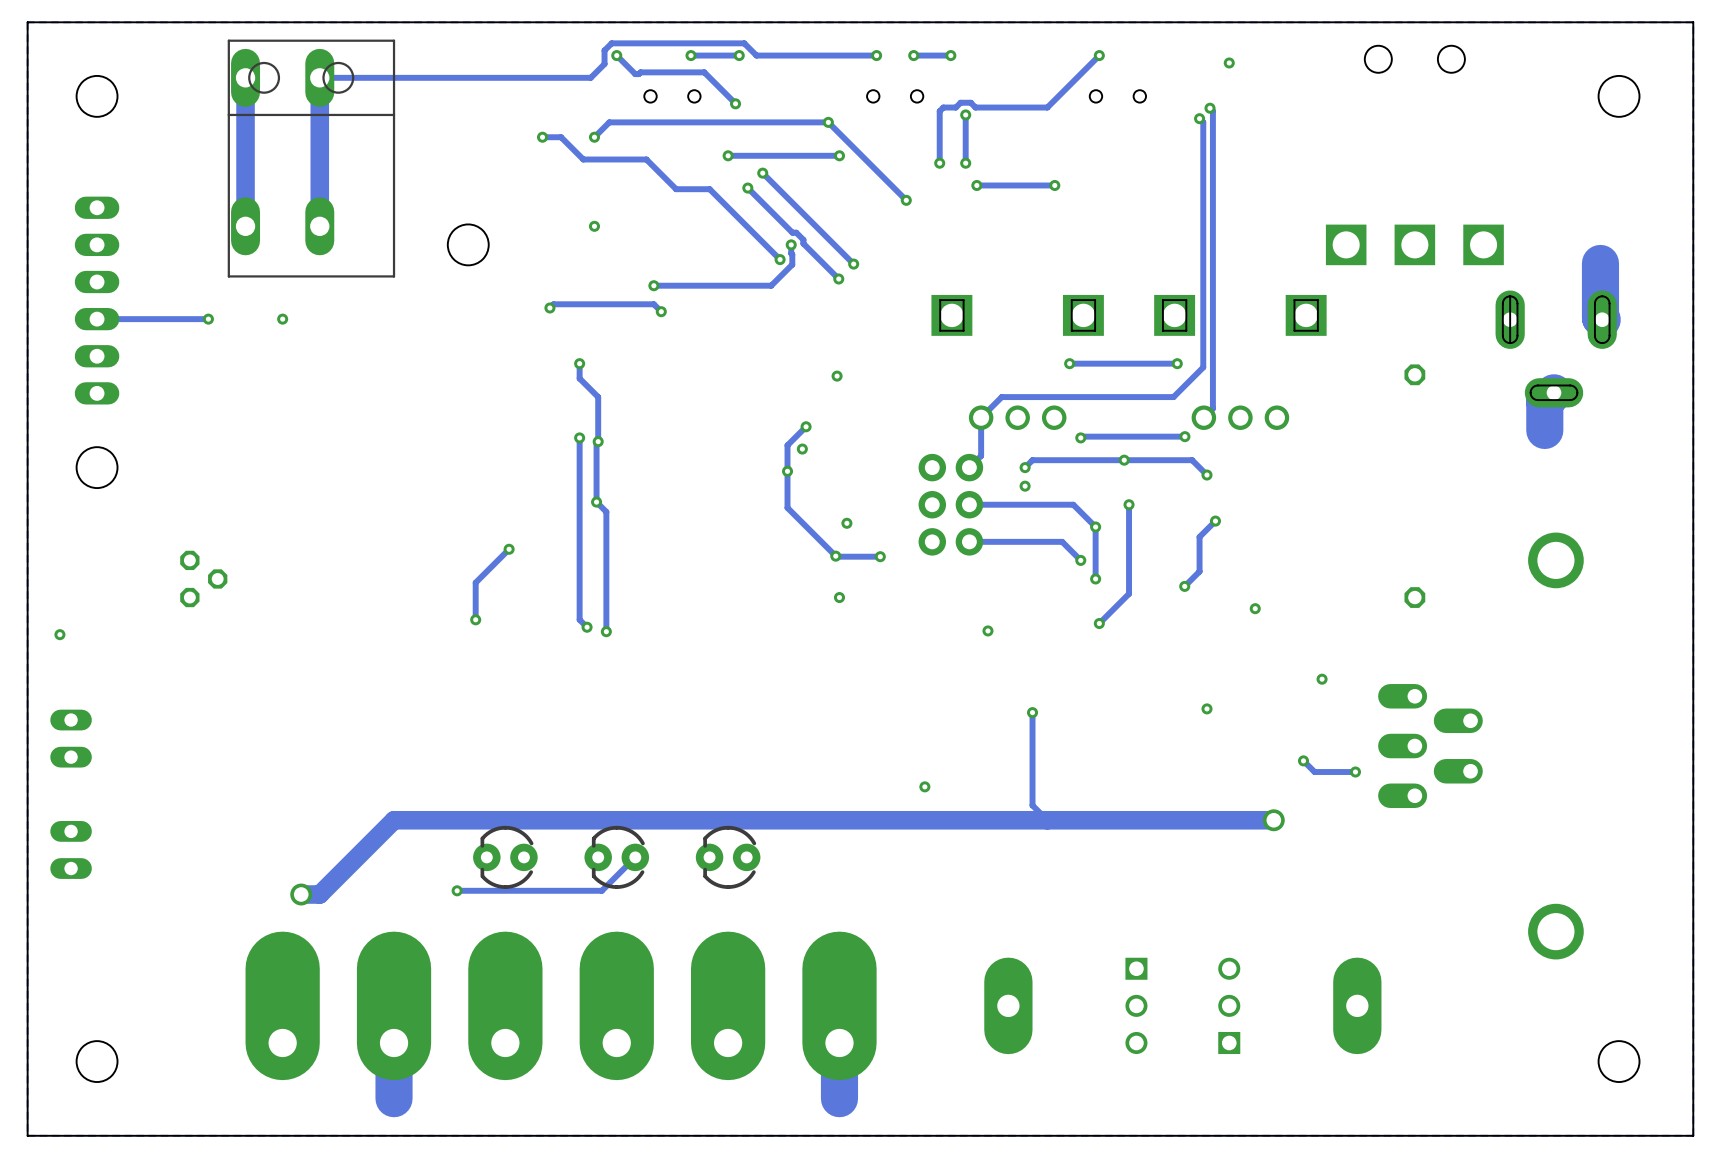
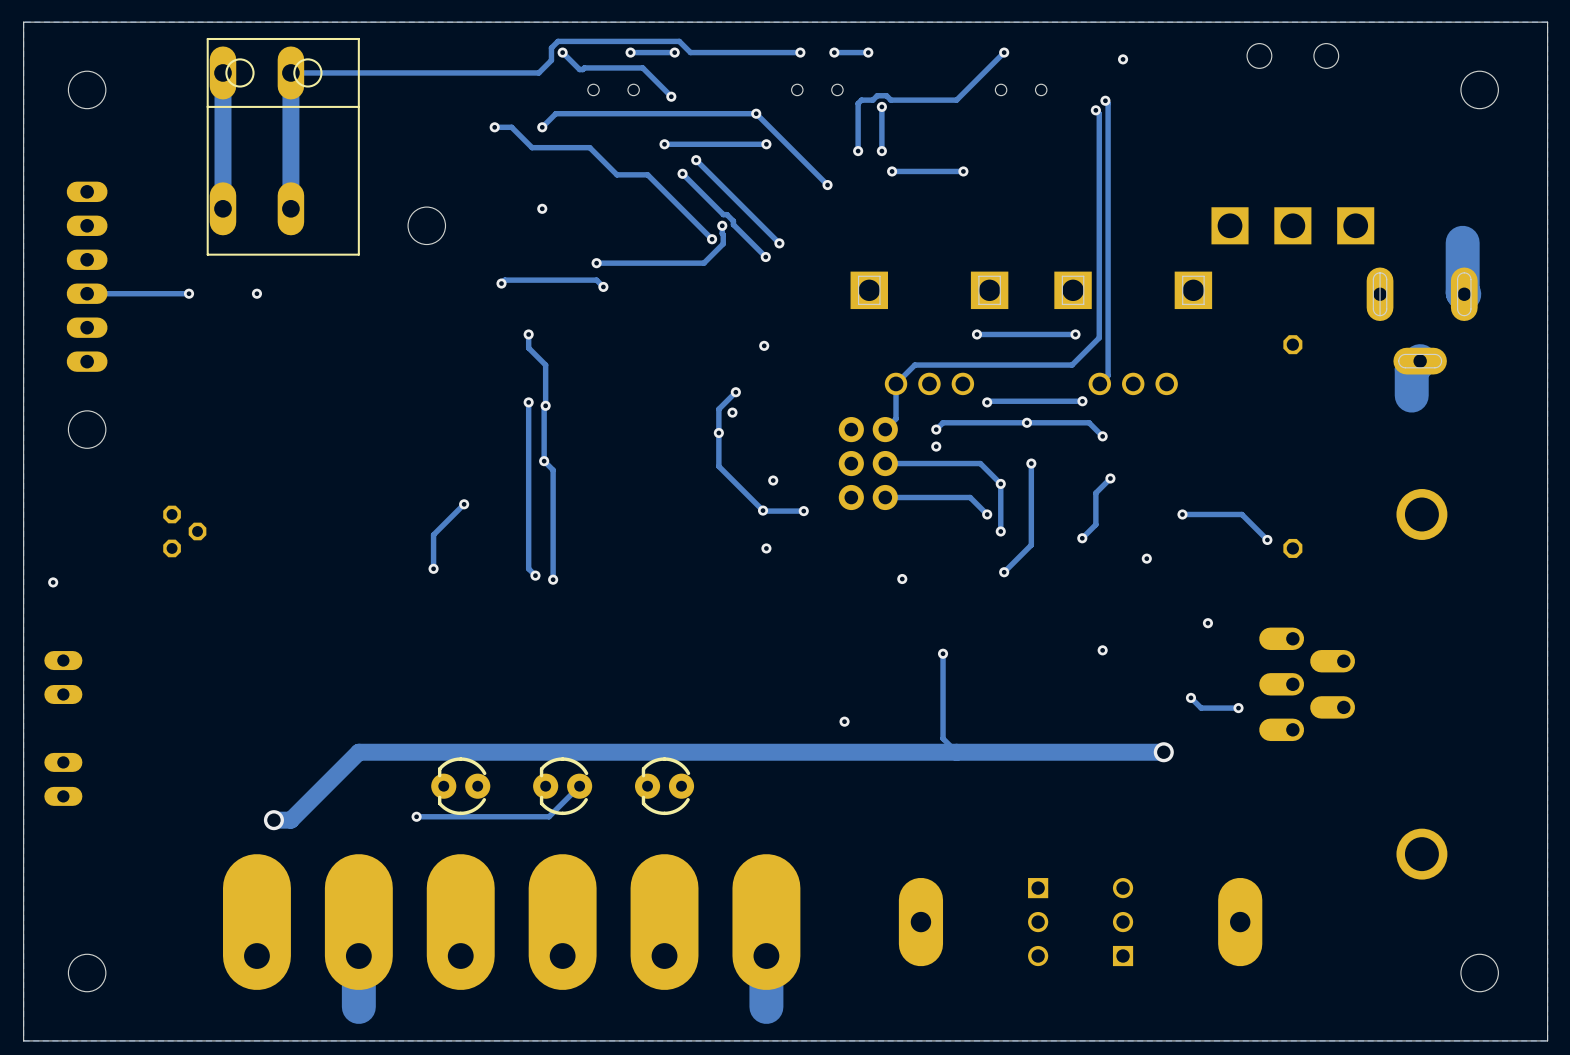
track: none -> (1182, 514) (1241, 514) (1267, 539)
via: none -> (1182, 514)
via: none -> (1267, 539)

